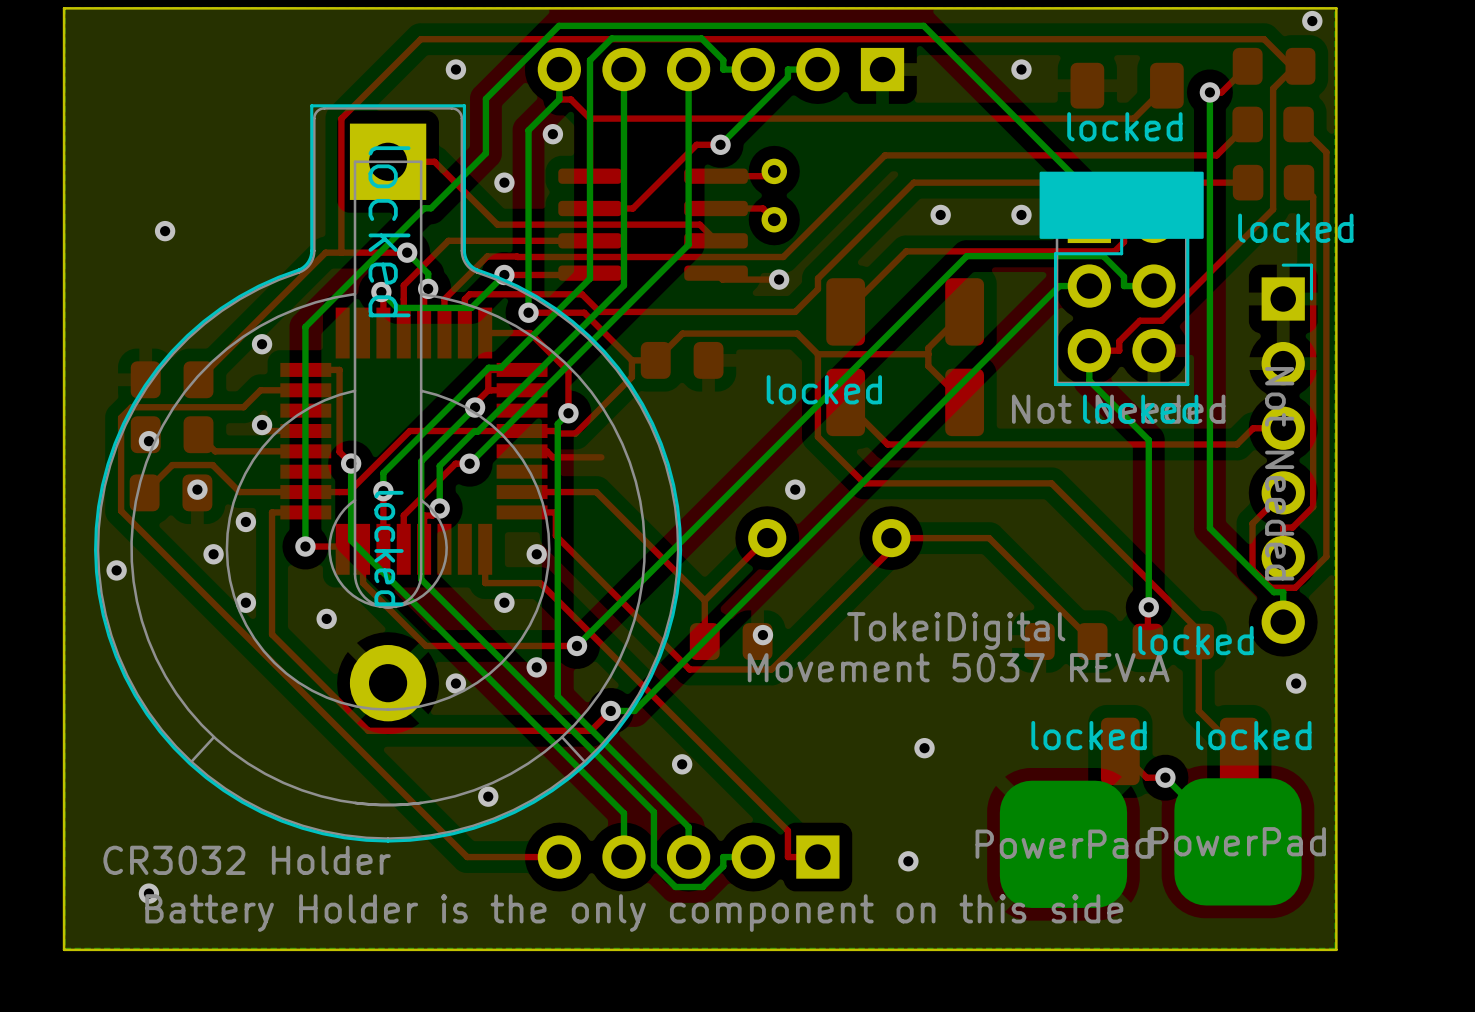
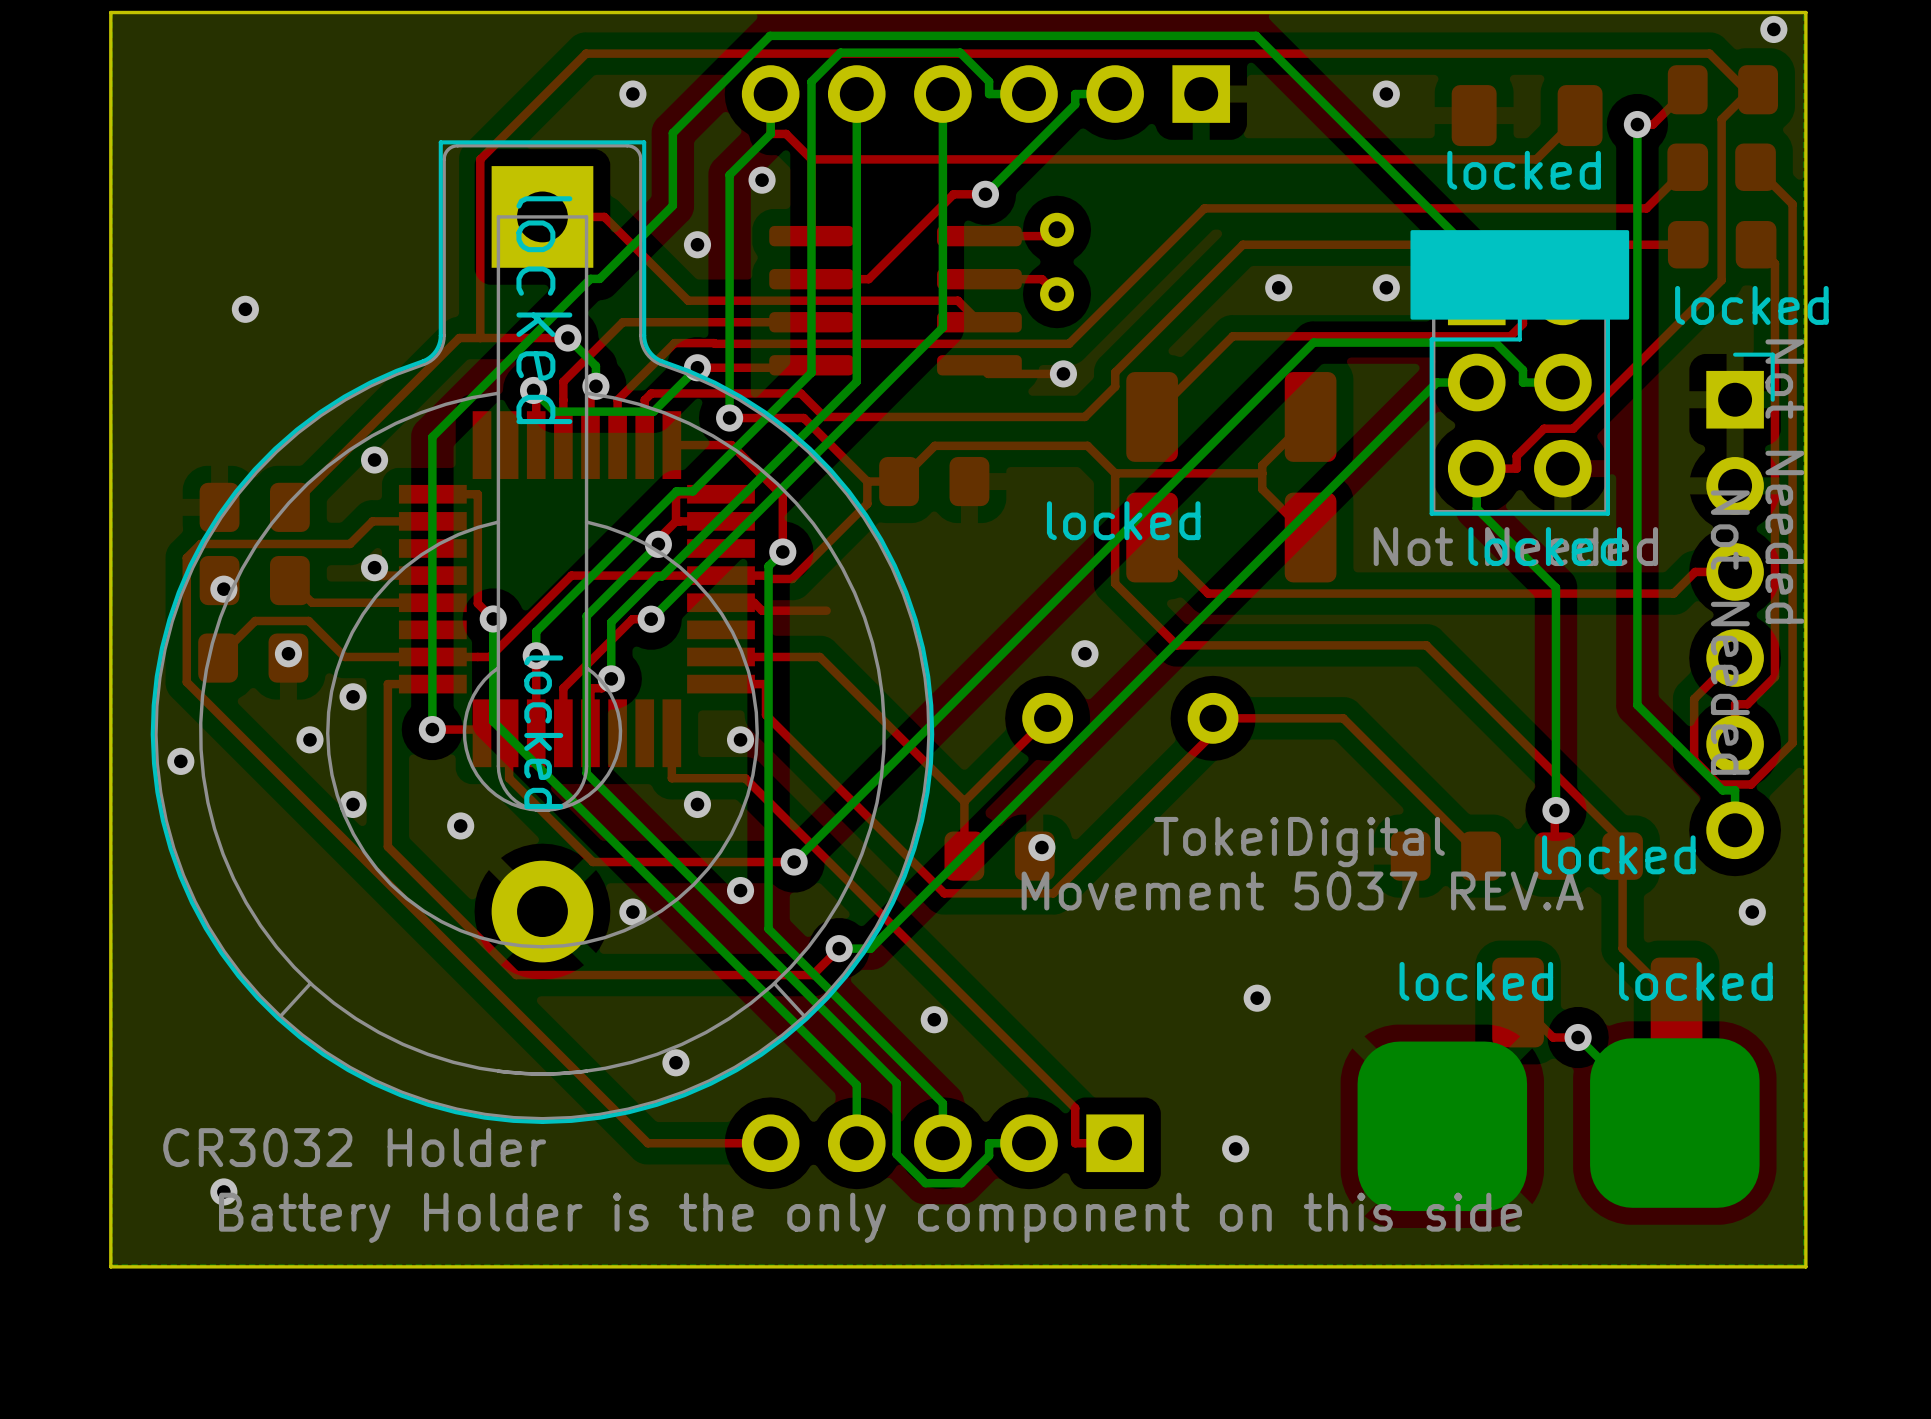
text: none -> Not Needed (1784, 481)
part value: PowerPad (1237, 841) -> none
part value: PowerPad (1063, 844) -> none

